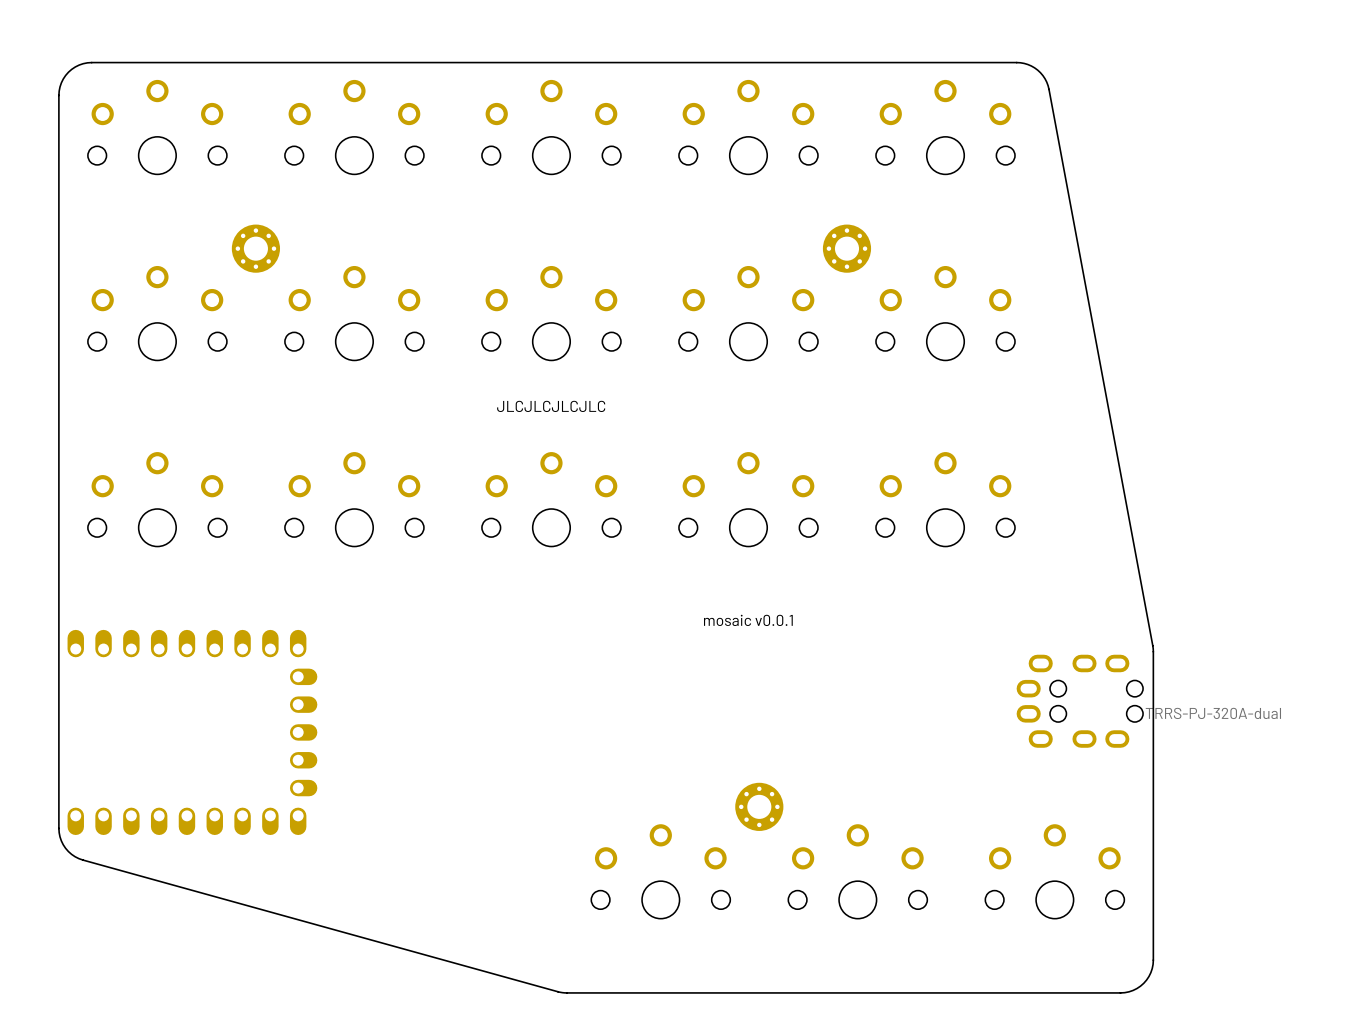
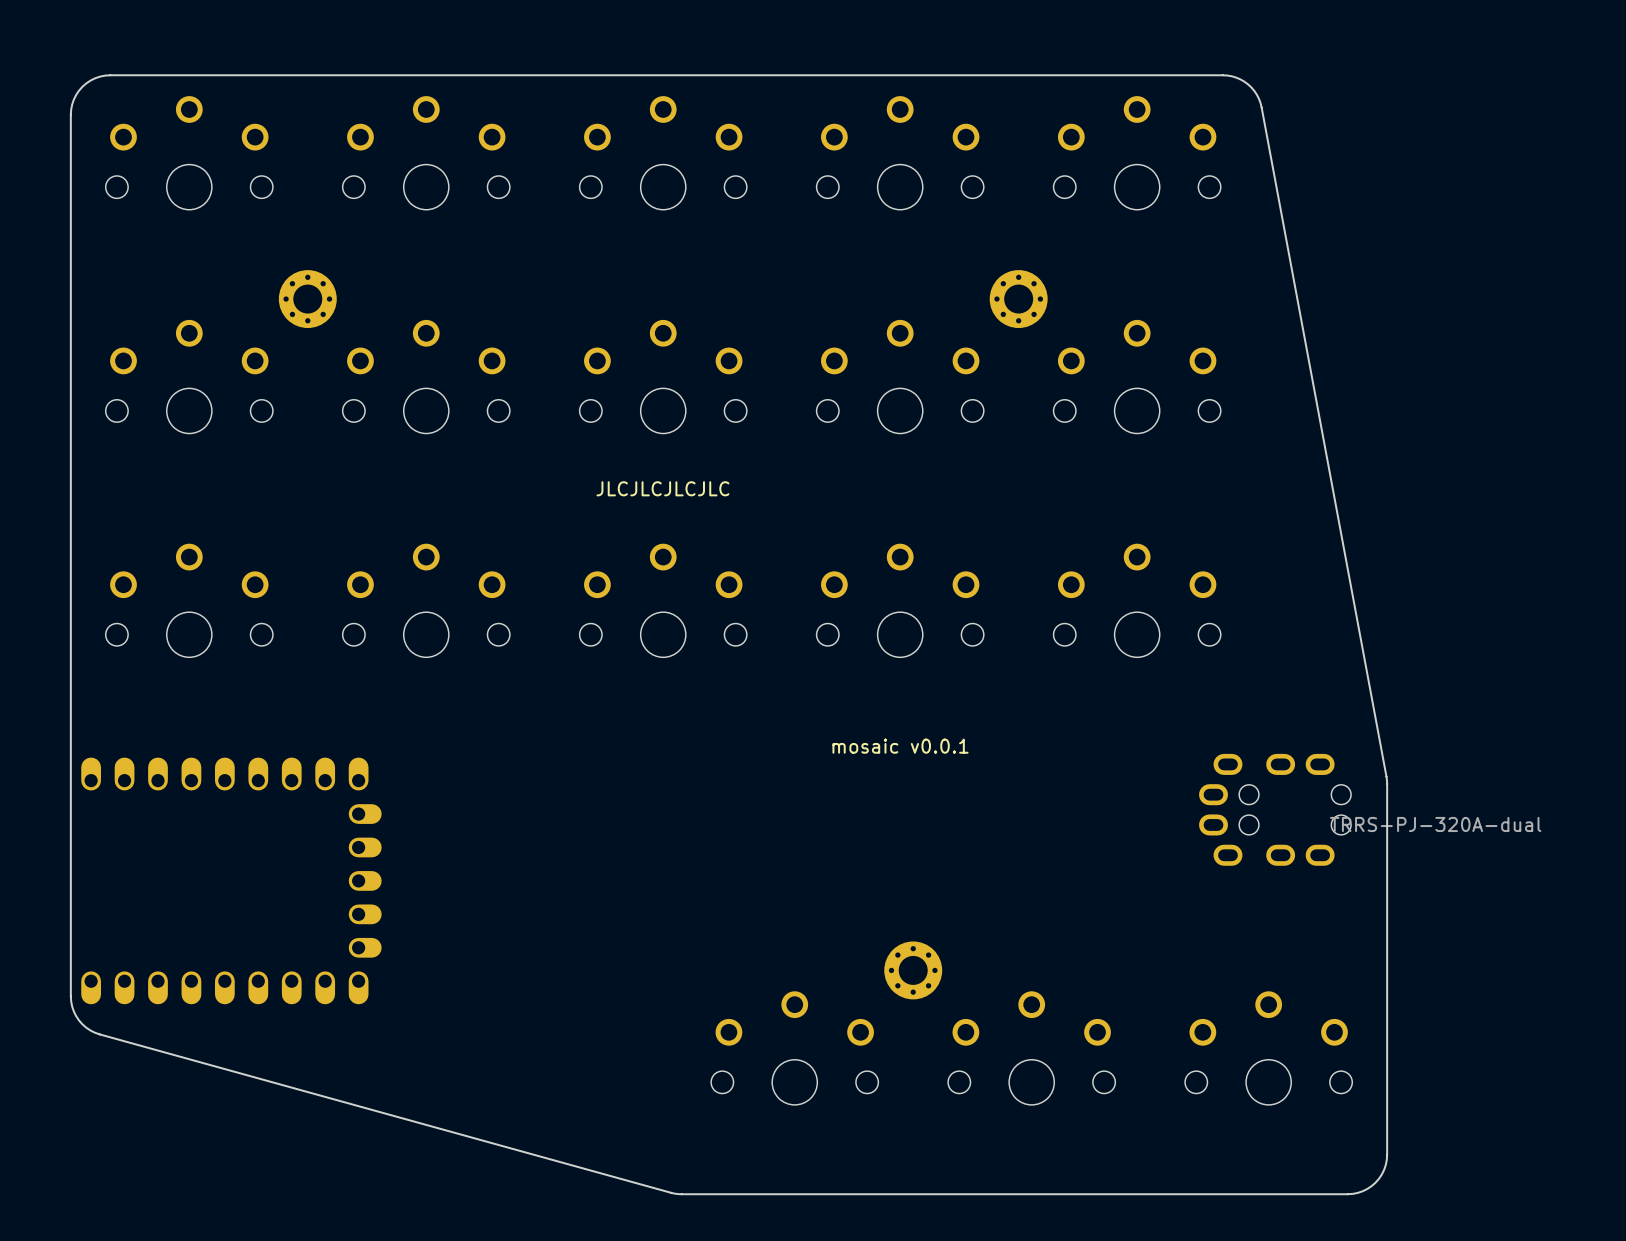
part position: (1079, 701) -> (1275, 809)

